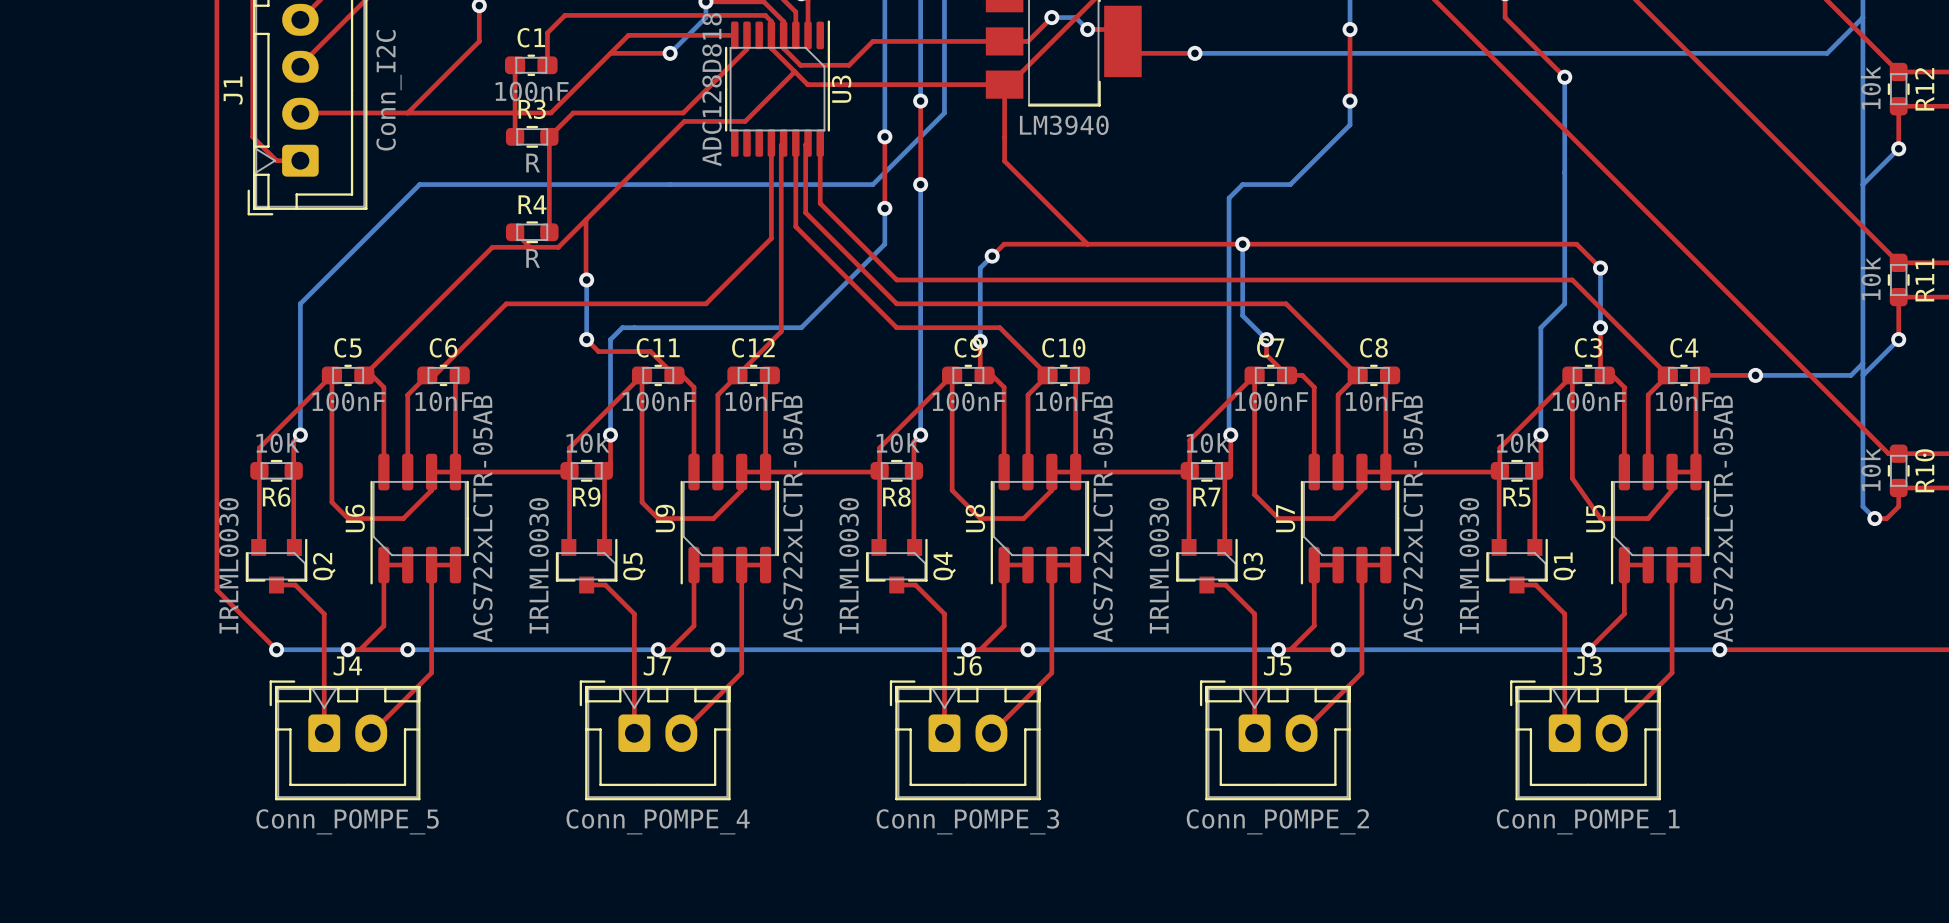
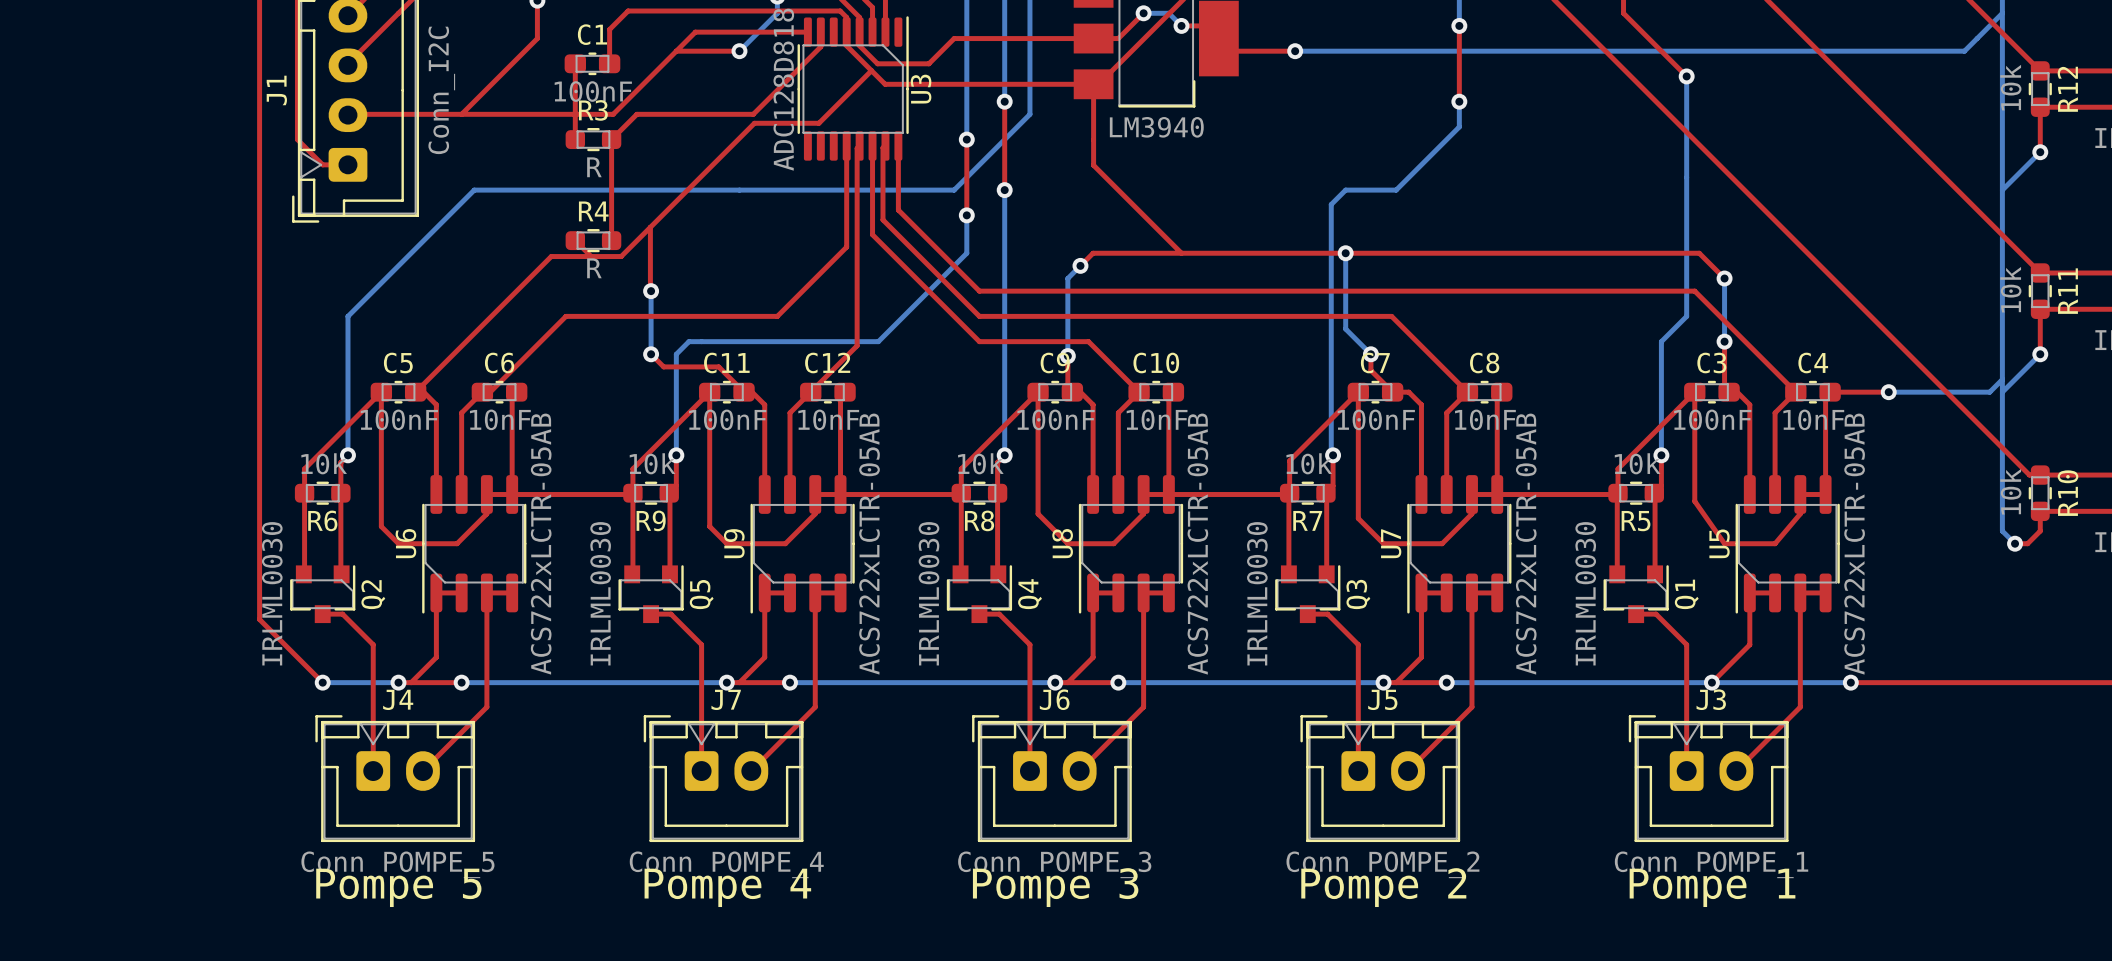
text: none -> Pompe 5 (398, 887)
text: none -> Pompe 4 (727, 887)
text: none -> Pompe 3 (1055, 887)
text: none -> Pompe 2 (1383, 887)
text: none -> Pompe 1 (1712, 887)

